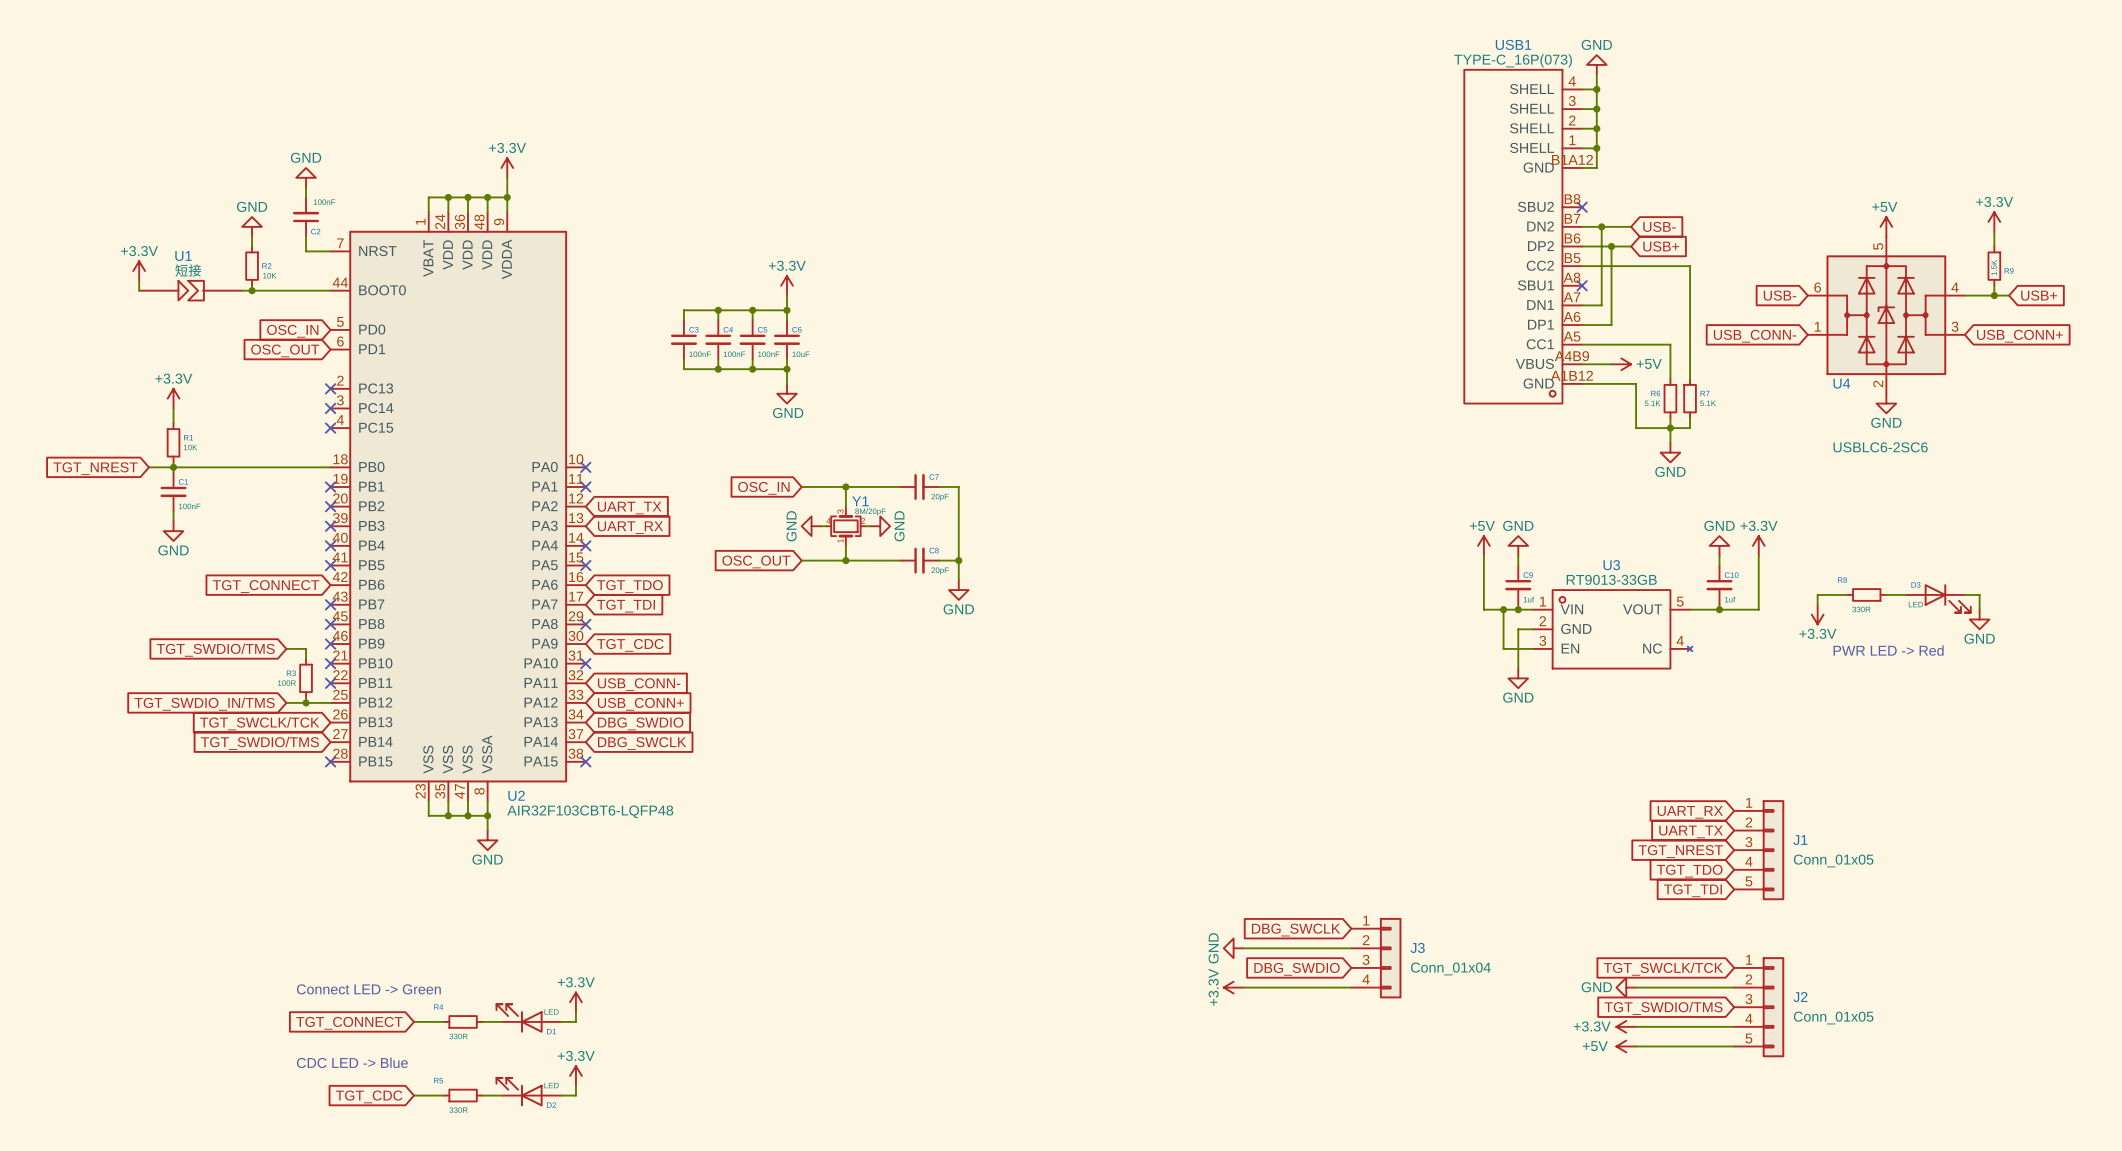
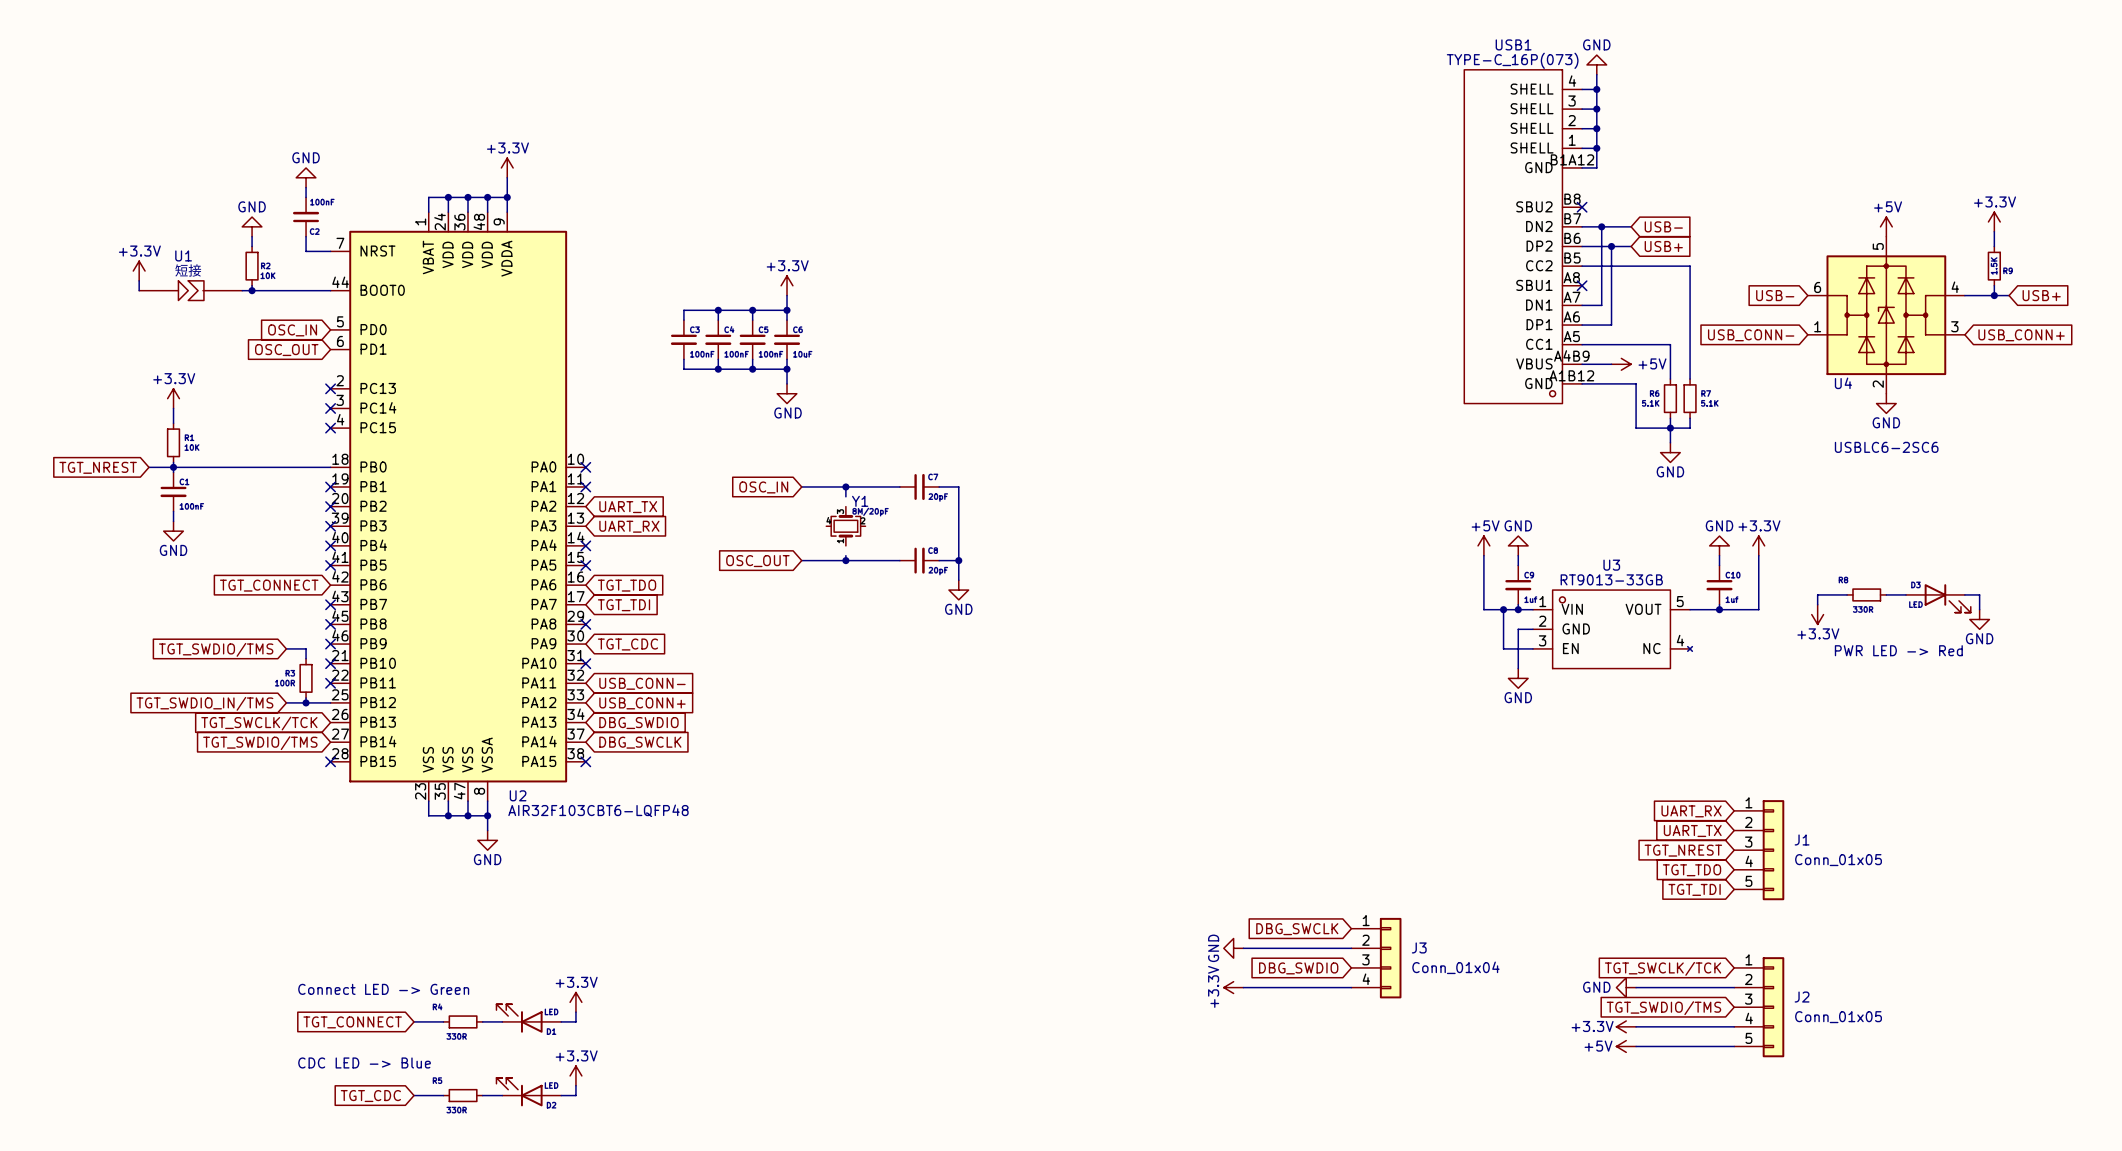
wire: (845, 496) (845, 506) -> none
power symbol: GND (811, 526) -> none
wire: (821, 526) (826, 526) -> none
wire: (865, 526) (870, 526) -> none
power symbol: GND (880, 526) -> none
wire: (845, 545) (845, 555) -> none

